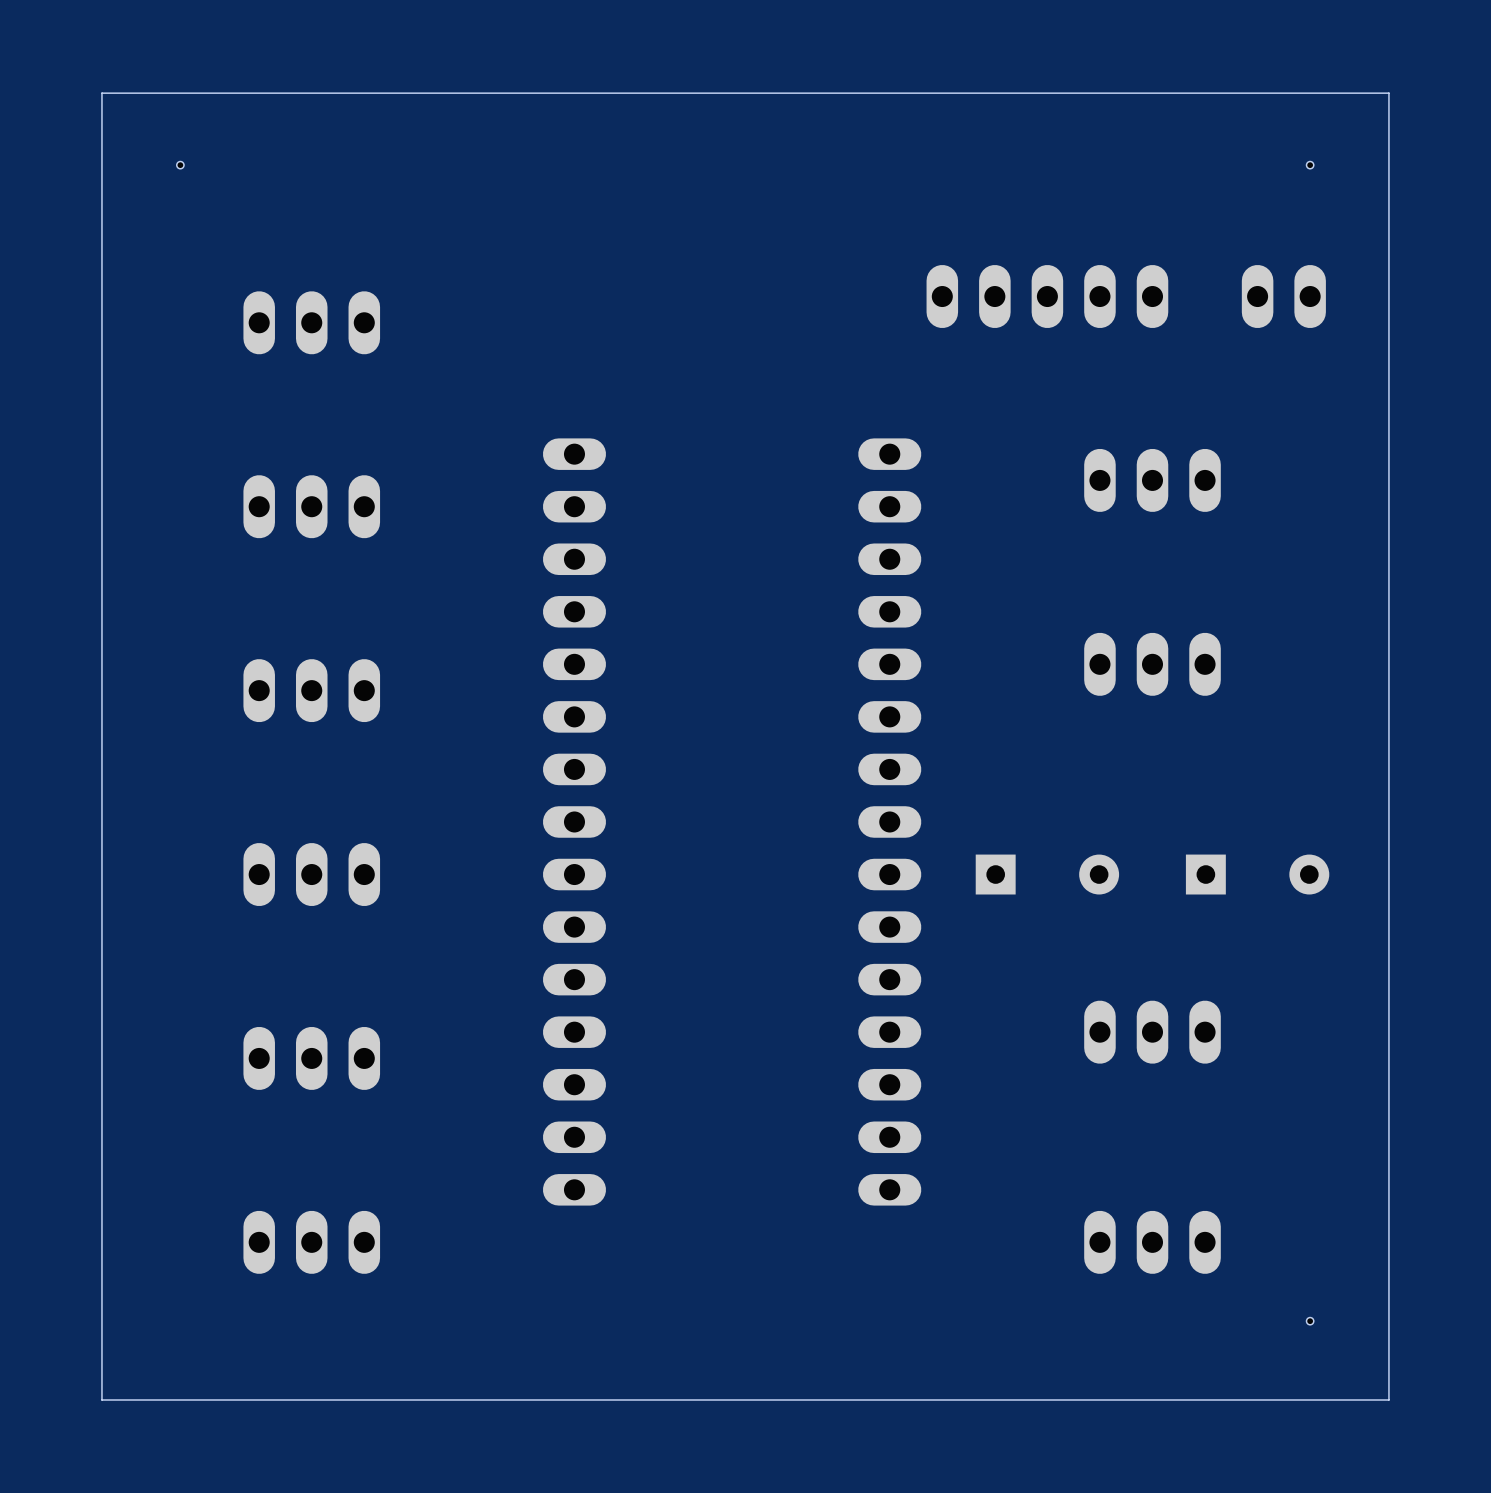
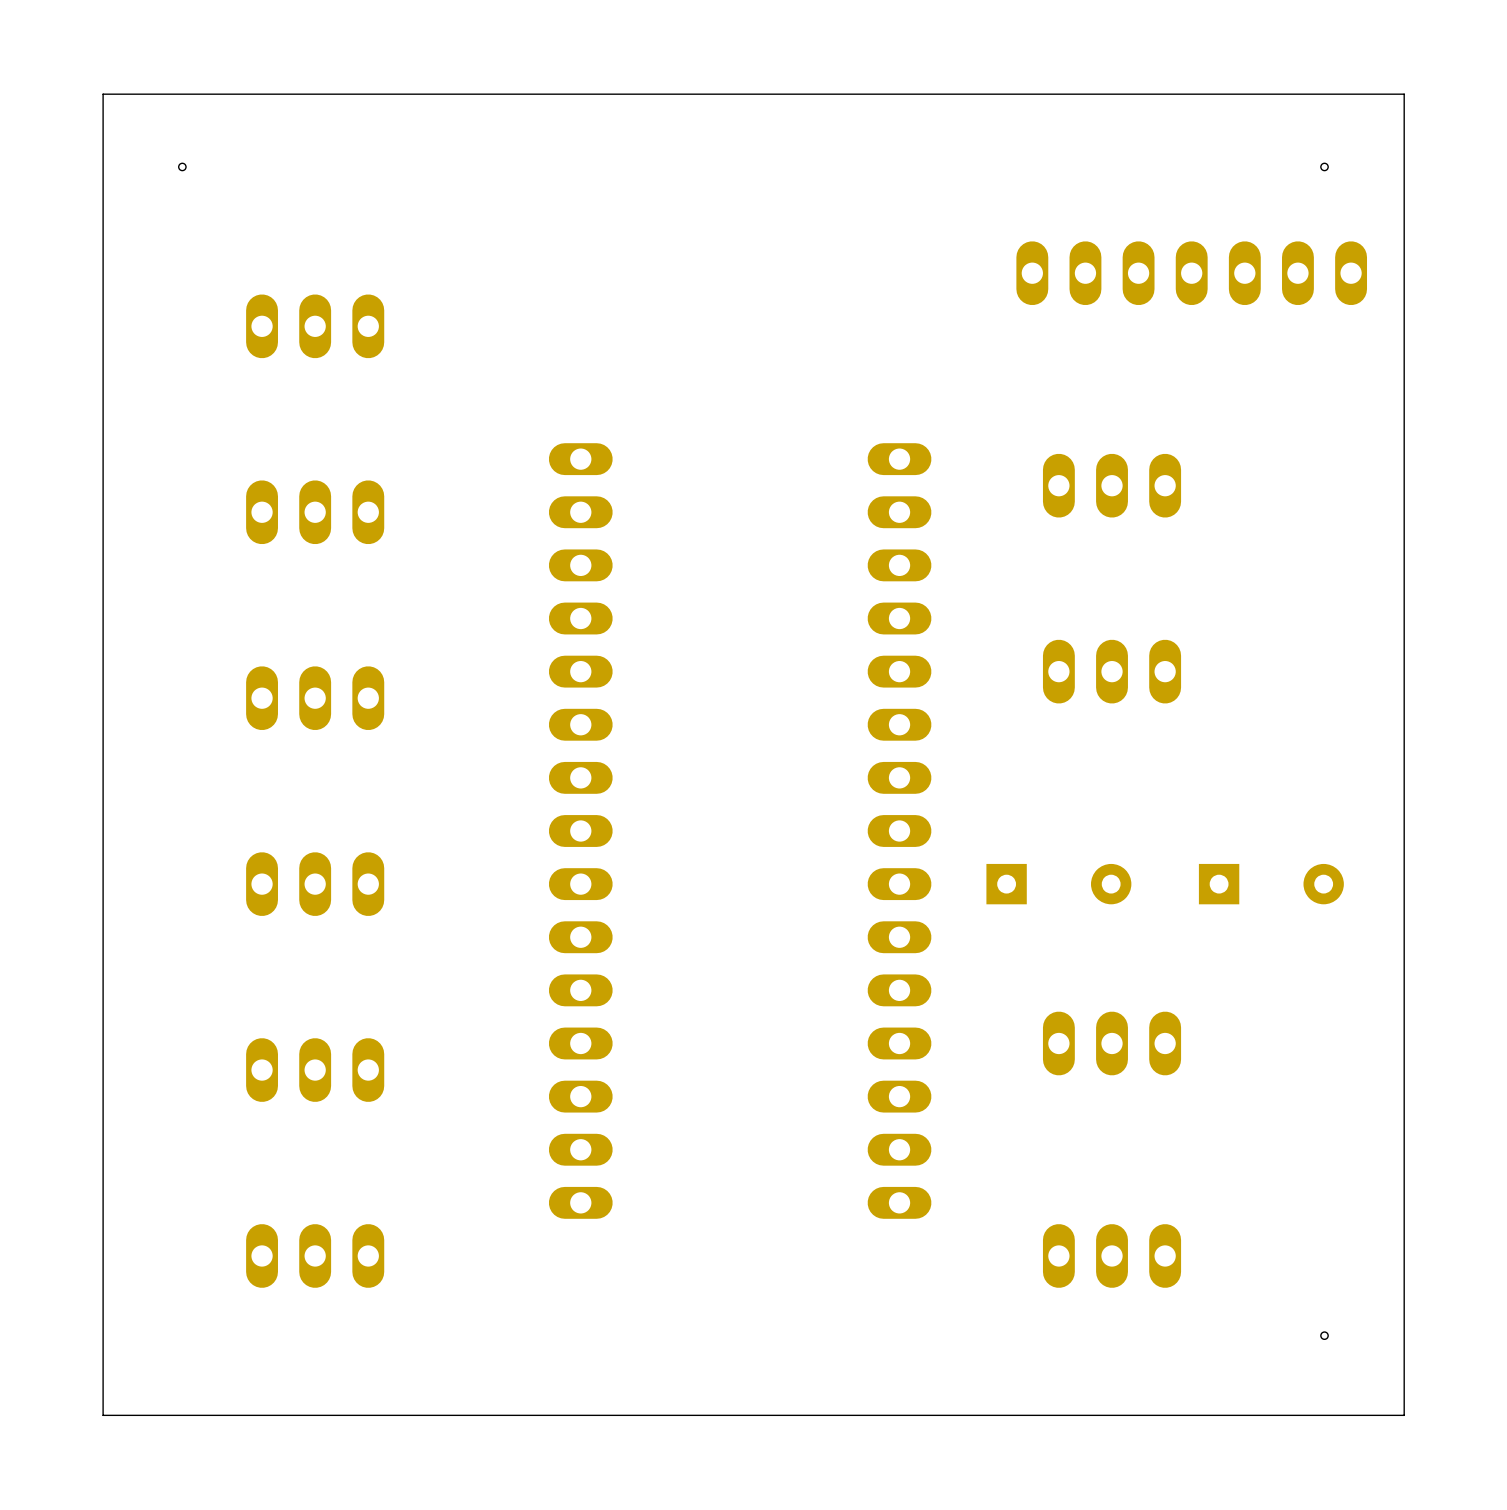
part: none -> (1191, 273)
part: (1047, 296) -> none
part: (1283, 296) -> none
part position: (1152, 480) -> (1112, 485)
part position: (1152, 664) -> (1112, 671)
part position: (1152, 1032) -> (1112, 1043)
part position: (1152, 1242) -> (1112, 1255)

